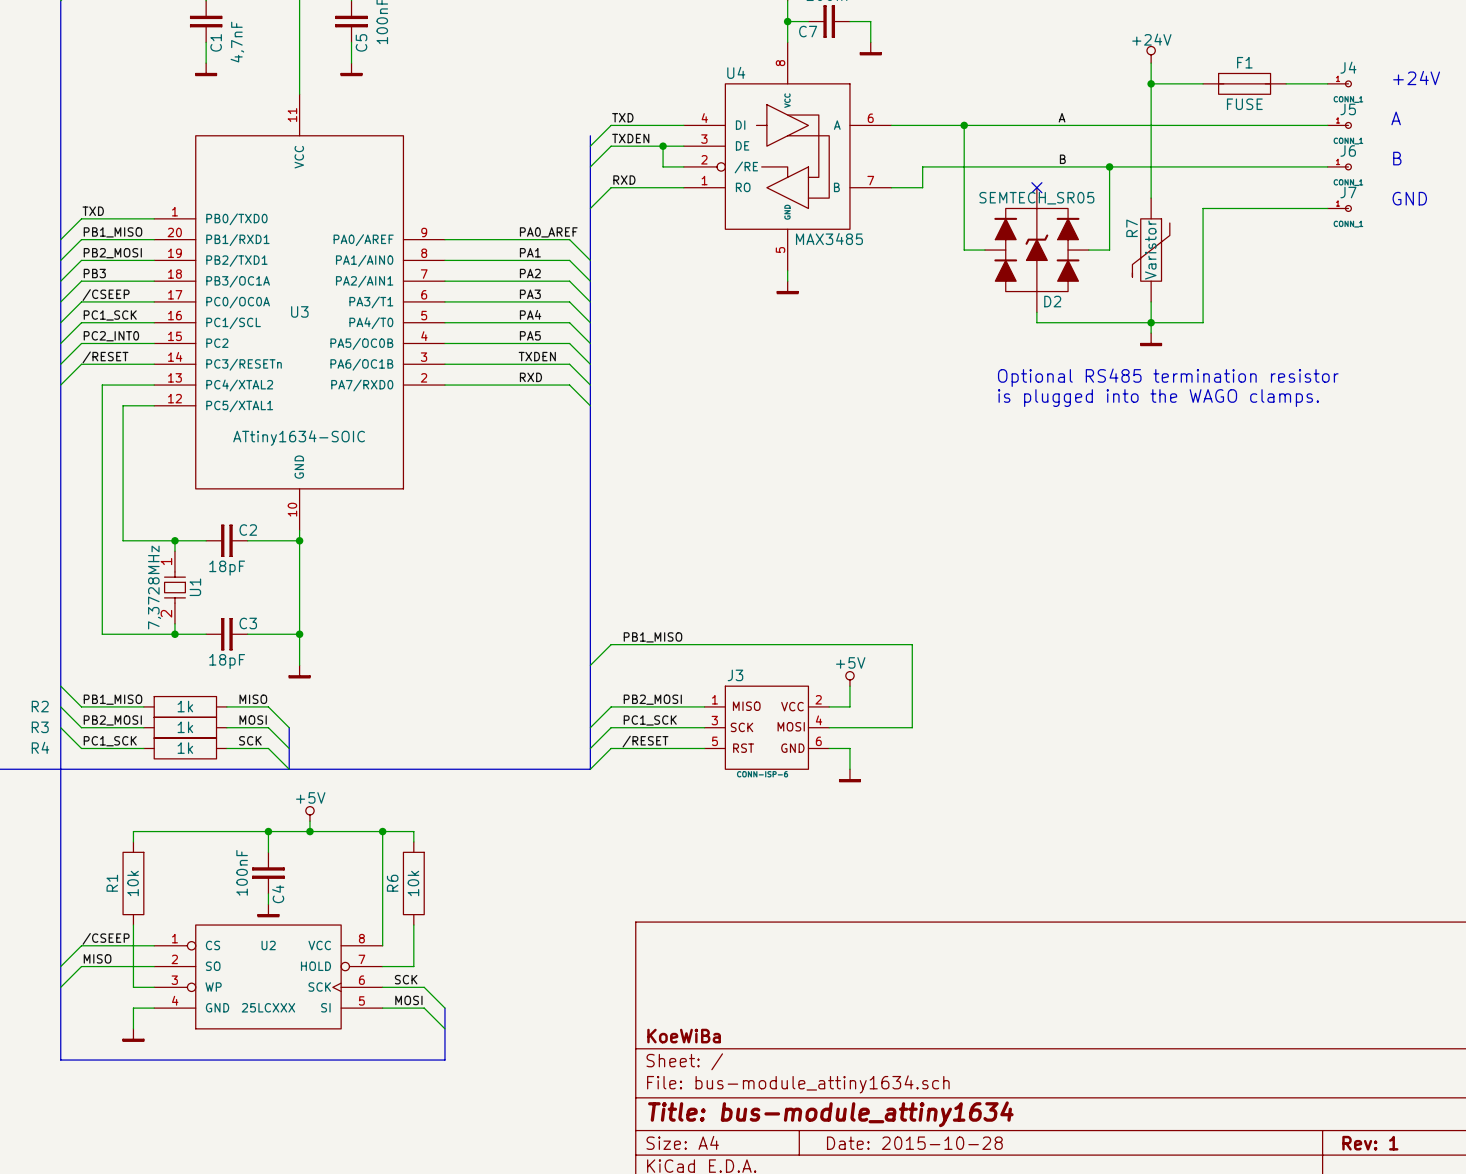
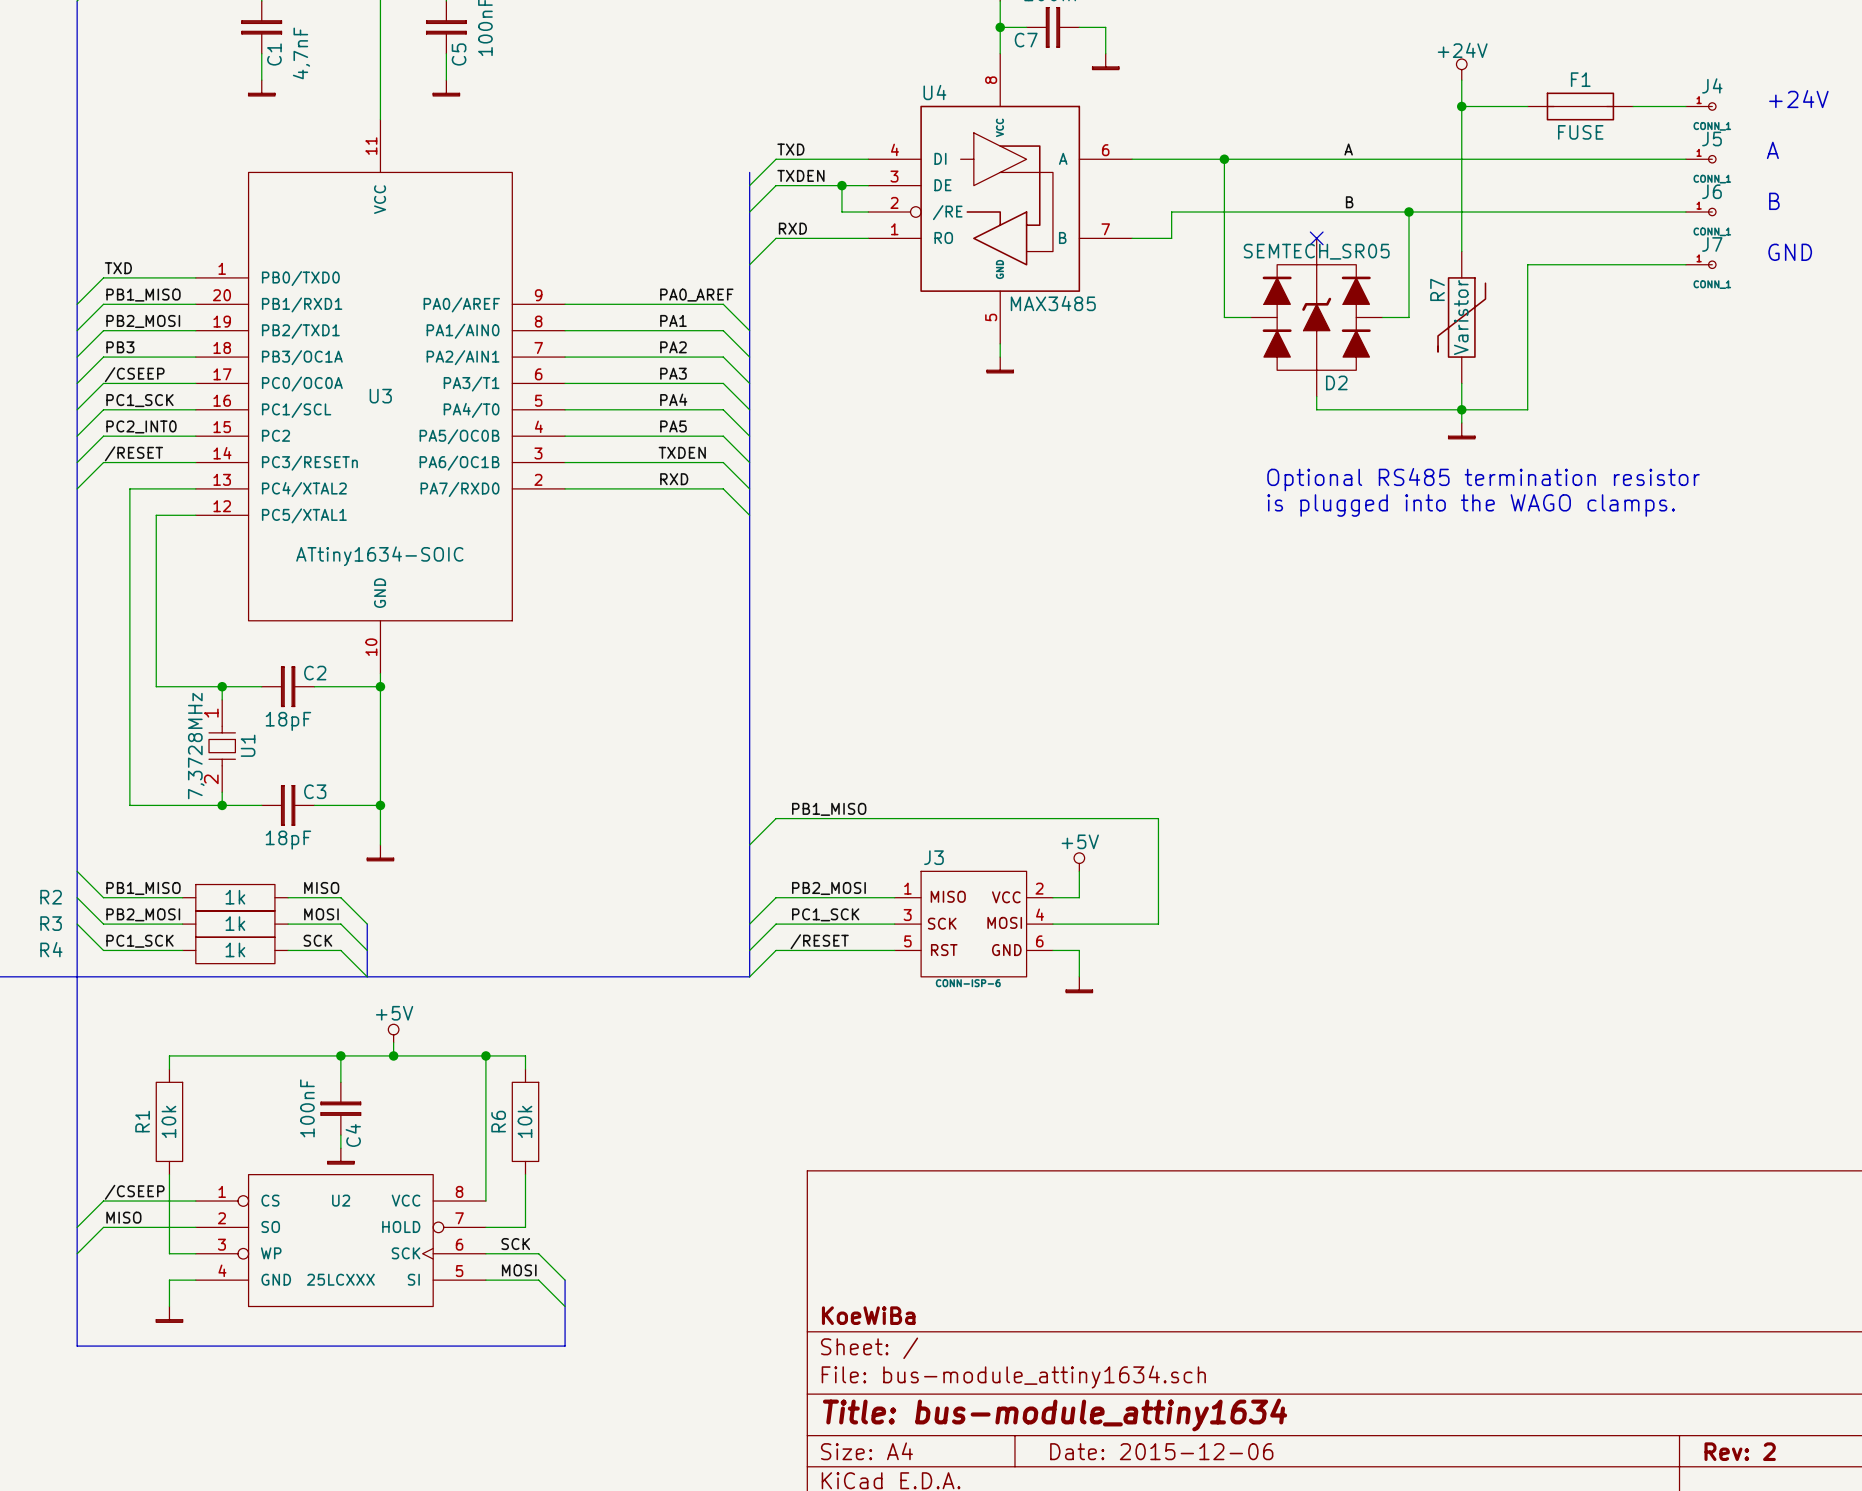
title block: Date: 2015-10-28 (914, 1143) -> Date: 2015-12-06 (1161, 1451)
title block: Rev: 1 (1370, 1143) -> Rev: 2 (1740, 1451)

